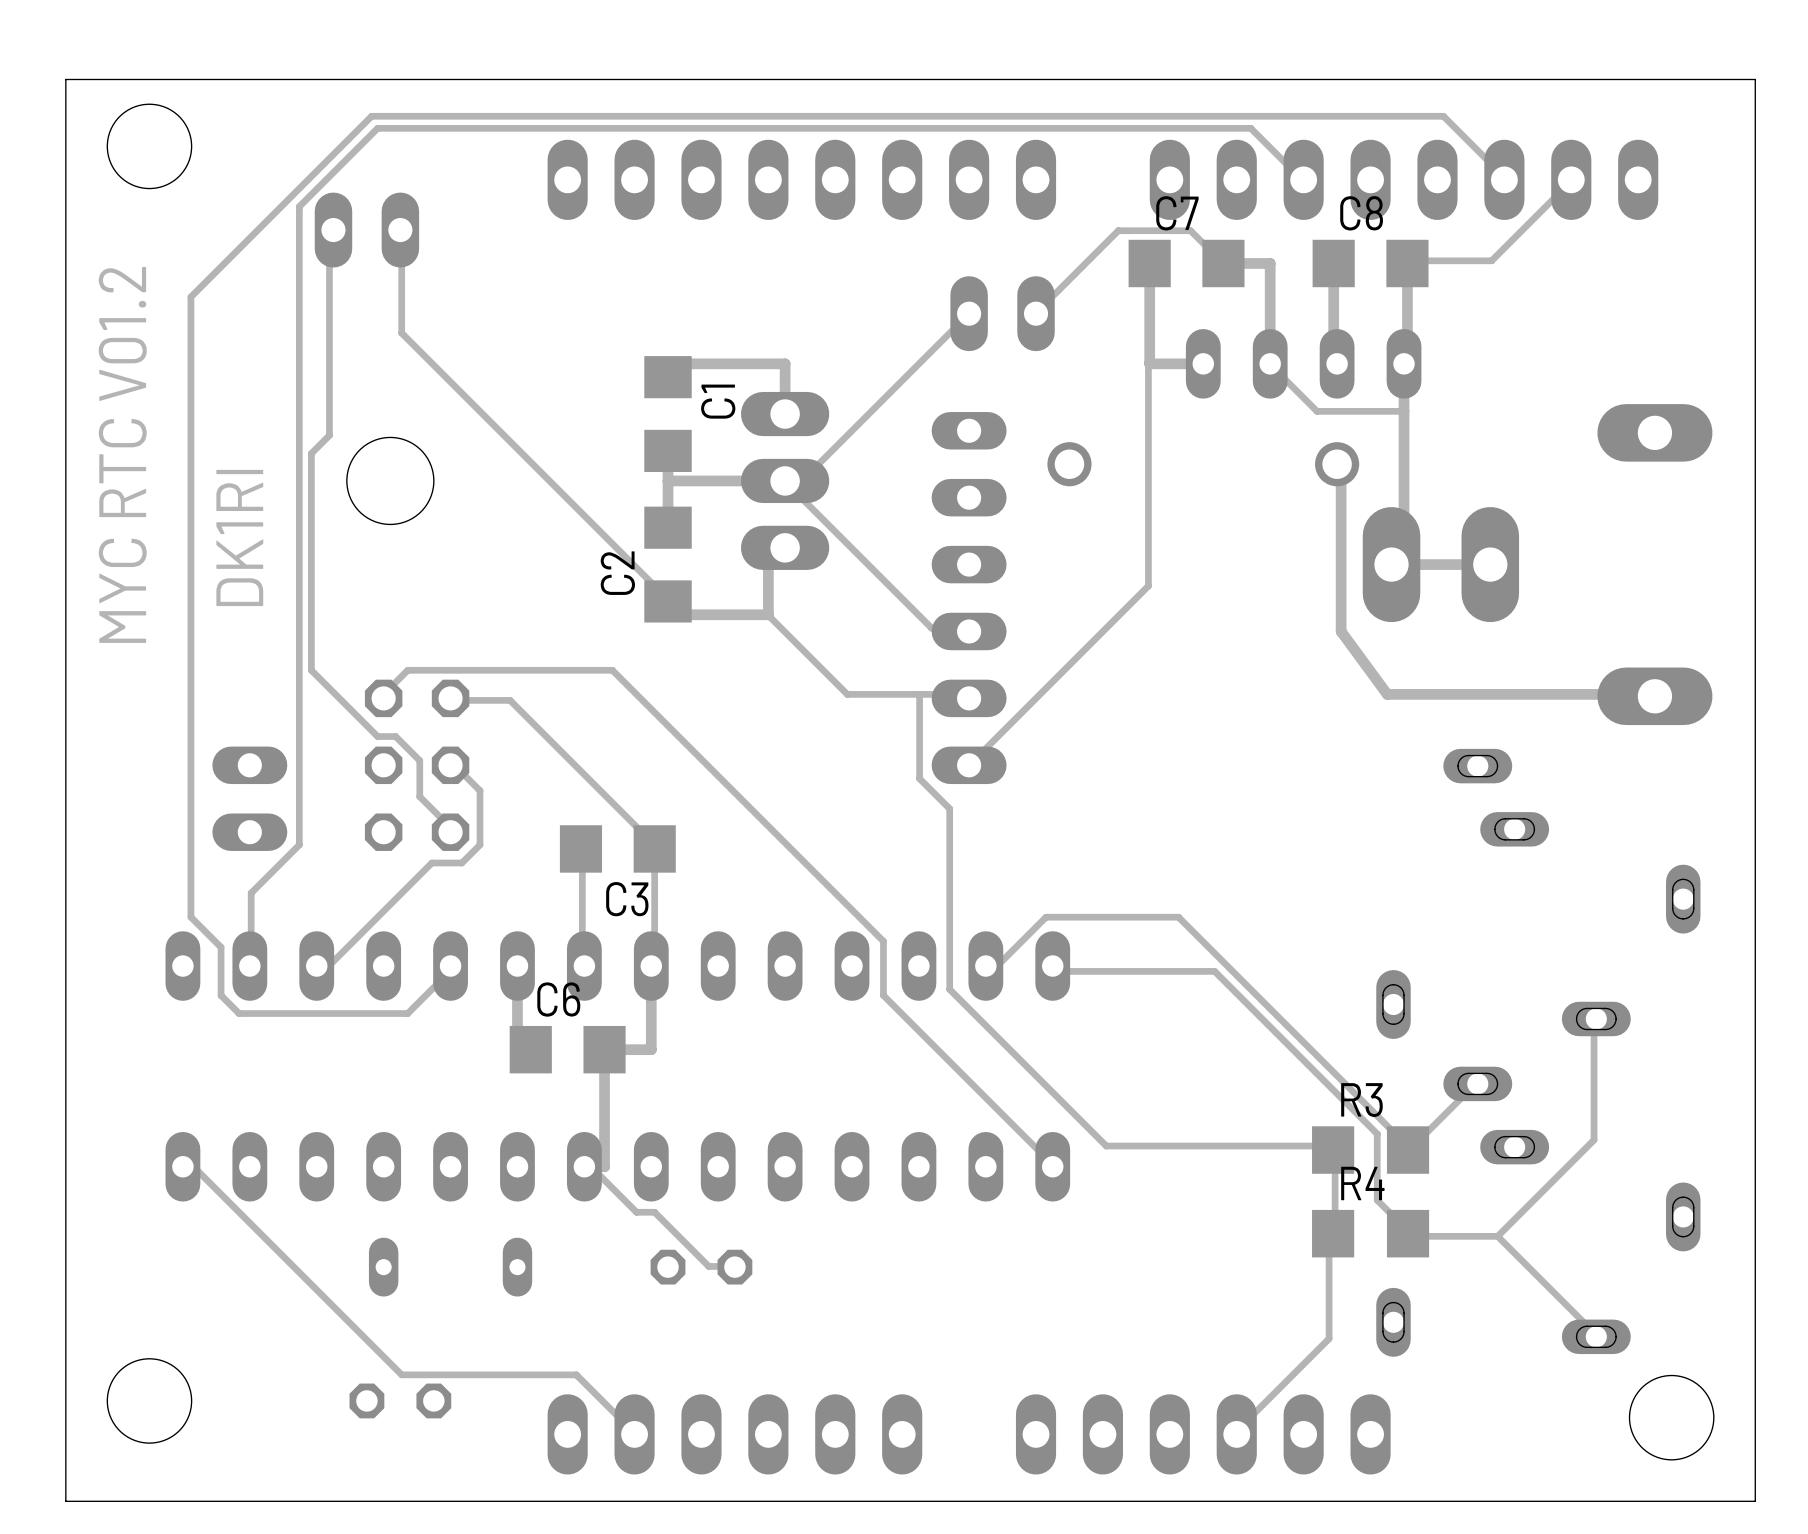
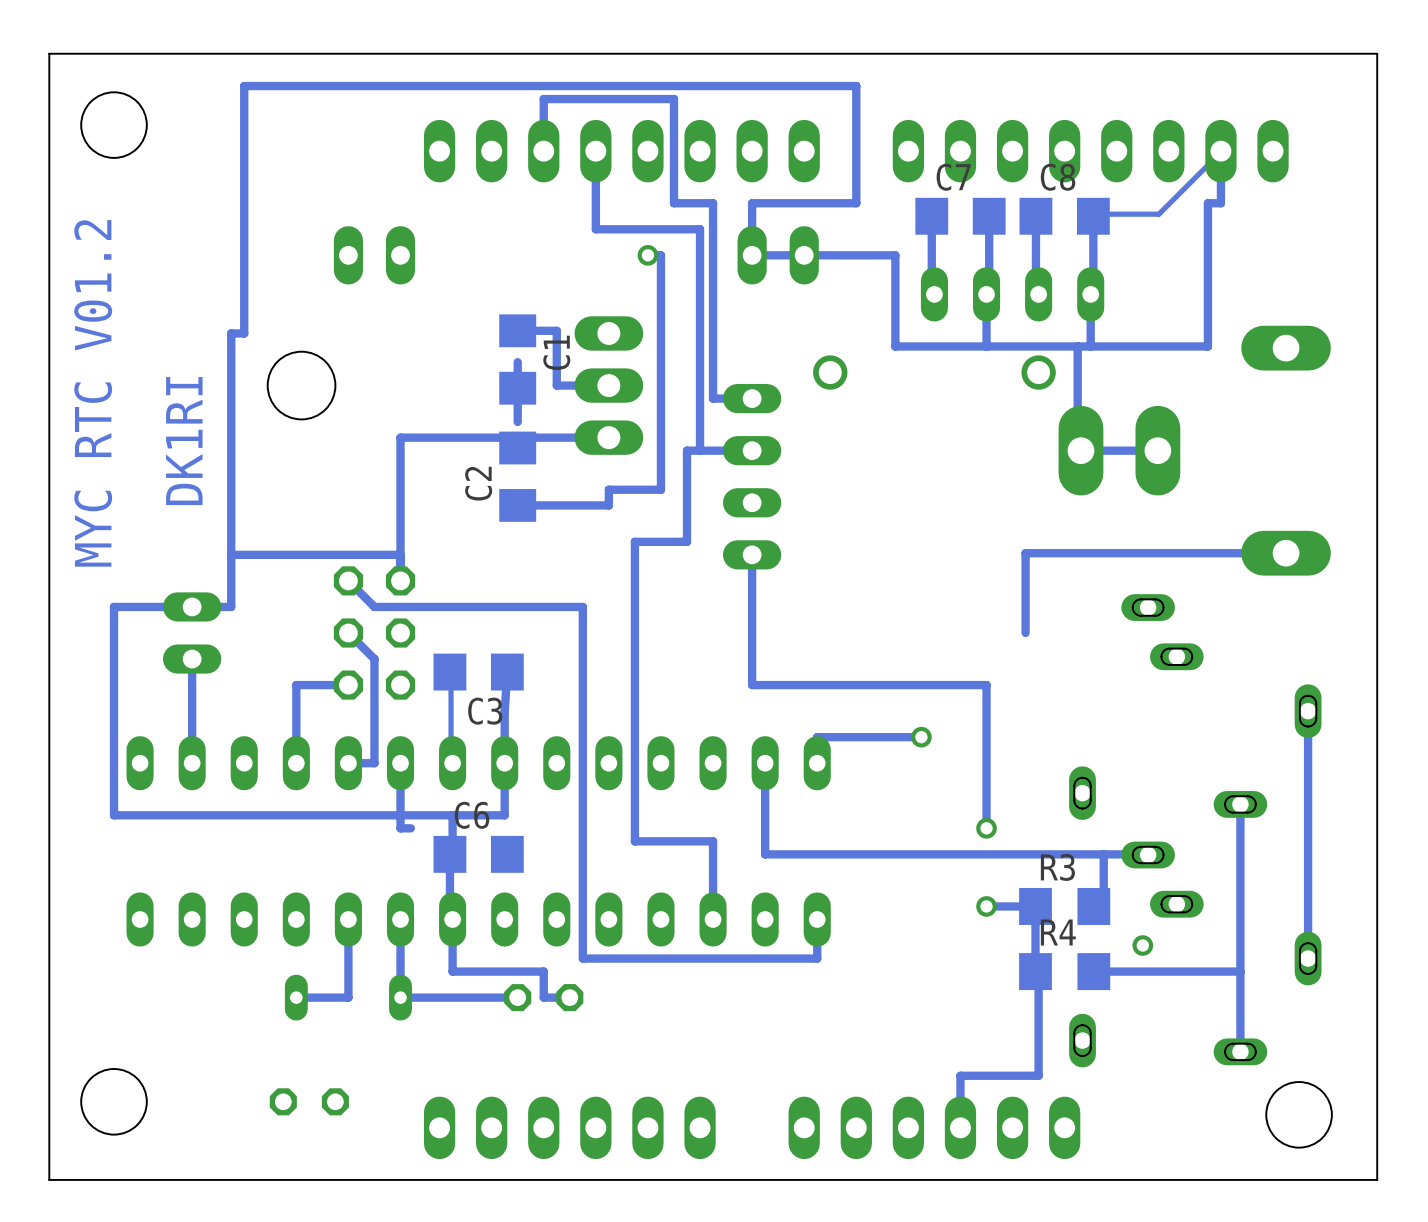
track: none -> (543, 151) (543, 99) (673, 99) (673, 203) (713, 203) (713, 398) (752, 398)
track: none -> (595, 151) (595, 229) (700, 229) (700, 450)
track: (1303, 179) (1250, 128) (377, 128) (299, 206) (299, 844) (251, 893) (249, 966) -> (192, 659) (192, 763)
track: (1504, 179) (1503, 176) (1443, 116) (371, 116) (190, 296) (190, 917) (221, 947) (221, 995) (239, 1013) (407, 1013) (449, 971) (450, 966) -> (348, 632) (374, 659) (374, 763) (348, 763)
track: none -> (1220, 151) (1220, 203) (1207, 203) (1207, 346) (895, 346) (895, 255) (752, 255) (752, 203) (856, 203) (856, 86) (244, 86) (244, 333) (231, 333) (231, 606) (114, 606) (114, 815) (504, 815)
track: (333, 230) (329, 230) (329, 435) (311, 453) (311, 670) (377, 736) (395, 736) (419, 760) (419, 796) (449, 826) (450, 832) -> none
part position: (366, 230) -> (374, 255)
track: (400, 230) (401, 333) (666, 598) (668, 614) (768, 614) -> none
track: (1149, 263) (1149, 363) (1199, 363) -> (931, 216) (931, 294)
C7 position: (1186, 263) -> (960, 216)
track: none -> (989, 216) (989, 294) (986, 294) (986, 346)
track: none -> (647, 255) (660, 255) (660, 489) (608, 489) (608, 505) (517, 505)
via: none -> (647, 255)
track: (969, 313) (793, 489) (785, 480) (787, 483) (931, 628) (967, 628) (969, 631) -> none
track: (1036, 313) (1118, 230) (1190, 230) (1223, 263) (1270, 263) (1270, 363) (1317, 411) (1404, 411) -> none
track: (1149, 363) (1148, 585) (969, 765) -> none
track: (668, 377) (668, 380) (651, 380) (651, 363) (785, 363) (785, 414) -> none
C1 position: (668, 414) -> (517, 359)
track: none -> (1077, 346) (1077, 414) (1080, 414) (1080, 450)
track: (1404, 430) (1404, 564) -> none
track: (1337, 464) (1341, 465) (1341, 631) (1387, 694) (1654, 694) (1654, 696) -> (1025, 632) (1025, 553) (1286, 553)
track: (718, 480) (668, 480) -> (556, 385) (556, 330) (517, 330)
part position: (969, 531) -> (752, 476)
track: (768, 547) (768, 614) -> (595, 437) (400, 437) (400, 580)
C2 position: (668, 564) -> (517, 476)
track: none -> (752, 450) (687, 450) (687, 541) (634, 541) (634, 841) (713, 841) (713, 919)
track: (768, 614) (847, 694) (967, 694) (969, 698) -> (986, 828) (986, 685) (752, 685) (752, 554)
track: (919, 694) (919, 778) (949, 808) (949, 989) (1106, 1146) (1329, 1146) (1335, 1152) (1335, 1230) (1329, 1236) (1329, 1338) (1238, 1429) (1236, 1434) -> (986, 906) (1035, 906) (1035, 971) (1038, 971) (1038, 1075) (960, 1075) (960, 1127)
track: (383, 698) (383, 694) (407, 670) (612, 670) (883, 941) (883, 995) (1052, 1166) -> (348, 580) (374, 606) (582, 606) (582, 958) (817, 958) (817, 919)
track: (450, 698) (455, 700) (510, 700) (654, 844) (654, 965) (651, 966) -> (507, 672) (504, 711) (504, 763)
track: none -> (400, 554) (231, 554)
part: (969, 731) -> none
part position: (417, 765) -> (374, 632)
track: (450, 765) (455, 766) (480, 790) (480, 844) (461, 863) (431, 863) (329, 965) (316, 966) -> none
track: none -> (348, 685) (296, 685) (296, 763)
track: none -> (1308, 711) (1308, 958)
via: none -> (921, 737)
track: (985, 966) (997, 965) (1046, 917) (1178, 917) (1407, 1146) (1408, 1150) (1473, 1085) (1477, 1083) -> (765, 763) (765, 854) (1148, 854)
track: (1052, 966) (1058, 971) (1214, 971) (1377, 1133) (1377, 1200) (1407, 1230) (1408, 1233) (1413, 1236) (1497, 1236) -> (817, 763) (817, 737) (921, 737)
track: (1596, 1018) (1594, 1019) (1594, 1140) (1497, 1236) -> (1240, 804) (1240, 1051)
track: (651, 1032) (651, 1049) (604, 1049) (604, 1166) (584, 1166) (594, 1170) (636, 1212) (654, 1212) (708, 1266) (734, 1267) -> (452, 815) (452, 854) (449, 854) (452, 971) (543, 971) (543, 997) (569, 997)
C6 position: (567, 1049) -> (478, 854)
via: none -> (986, 828)
track: none -> (1103, 854) (1103, 906) (1093, 906)
via: none -> (986, 906)
track: (182, 1166) (184, 1170) (196, 1170) (401, 1374) (576, 1374) (634, 1434) -> none
track: none -> (348, 919) (348, 997) (296, 997)
track: none -> (400, 919) (400, 997) (517, 997)
via: none -> (1142, 945)
track: none -> (1240, 971) (1093, 971)
track: (1497, 1236) (1596, 1336) -> none
board edge: (1755, 1501) (1755, 79) (65, 79) (65, 1501) -> (1364, 1179) (1377, 1179) (1377, 53) (49, 53) (49, 1179)

